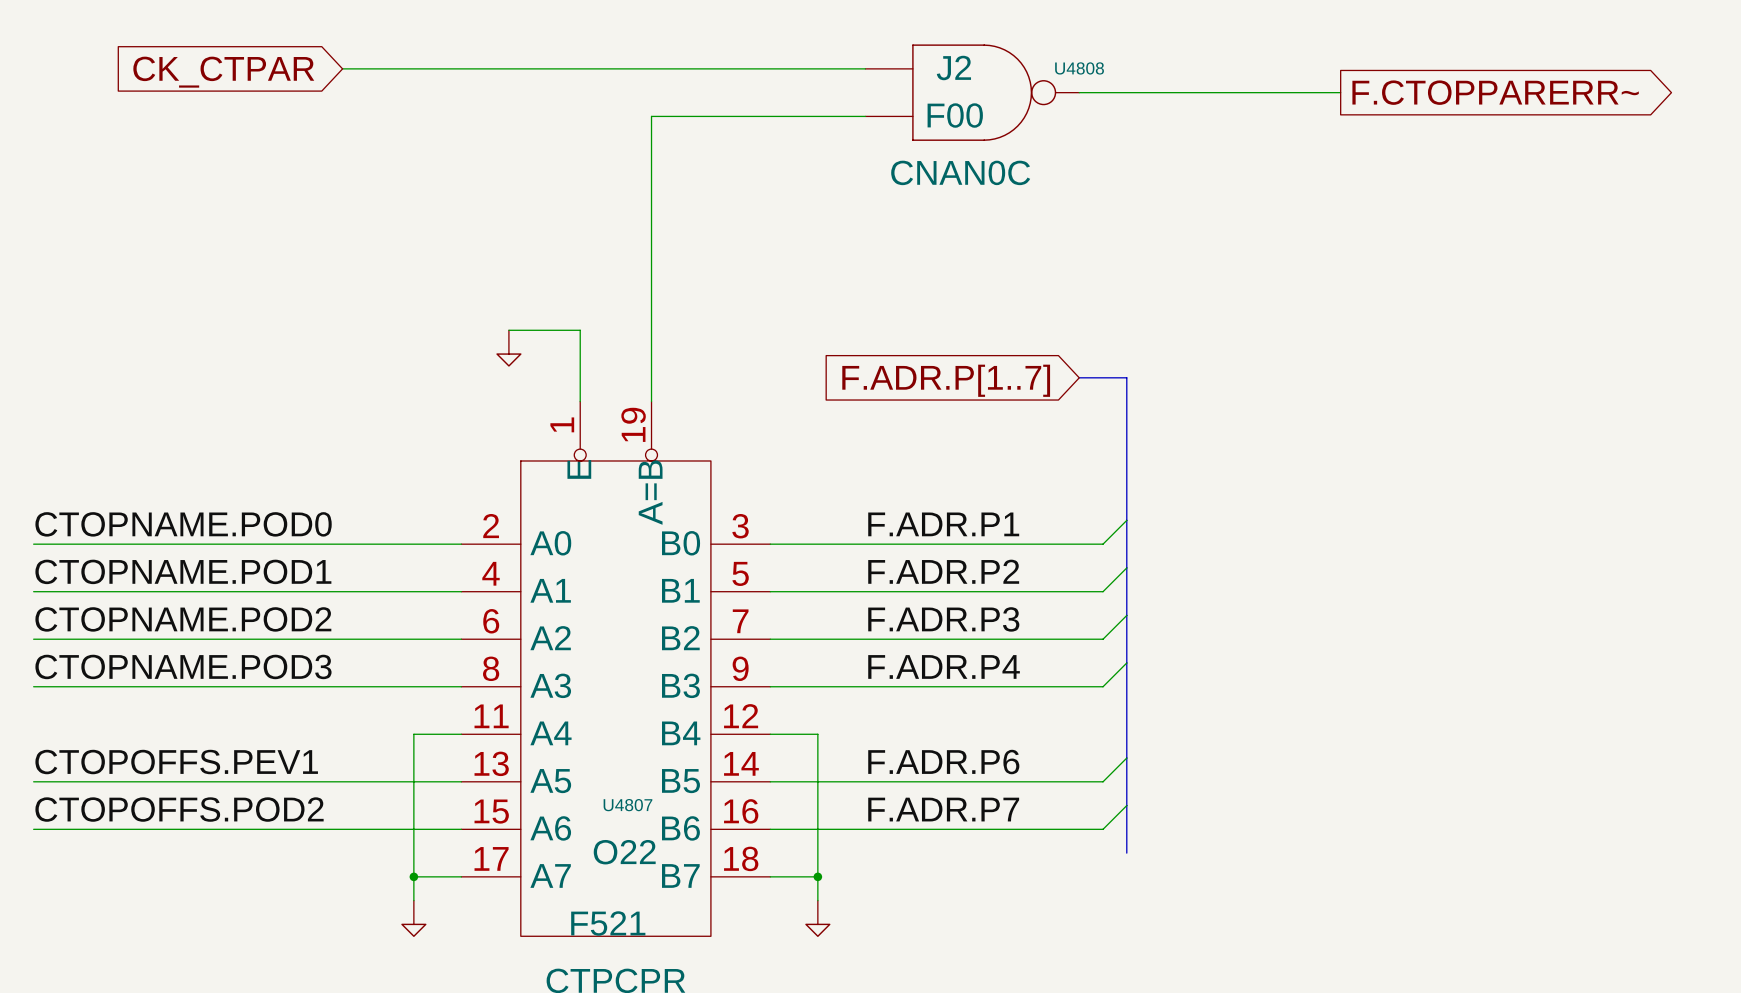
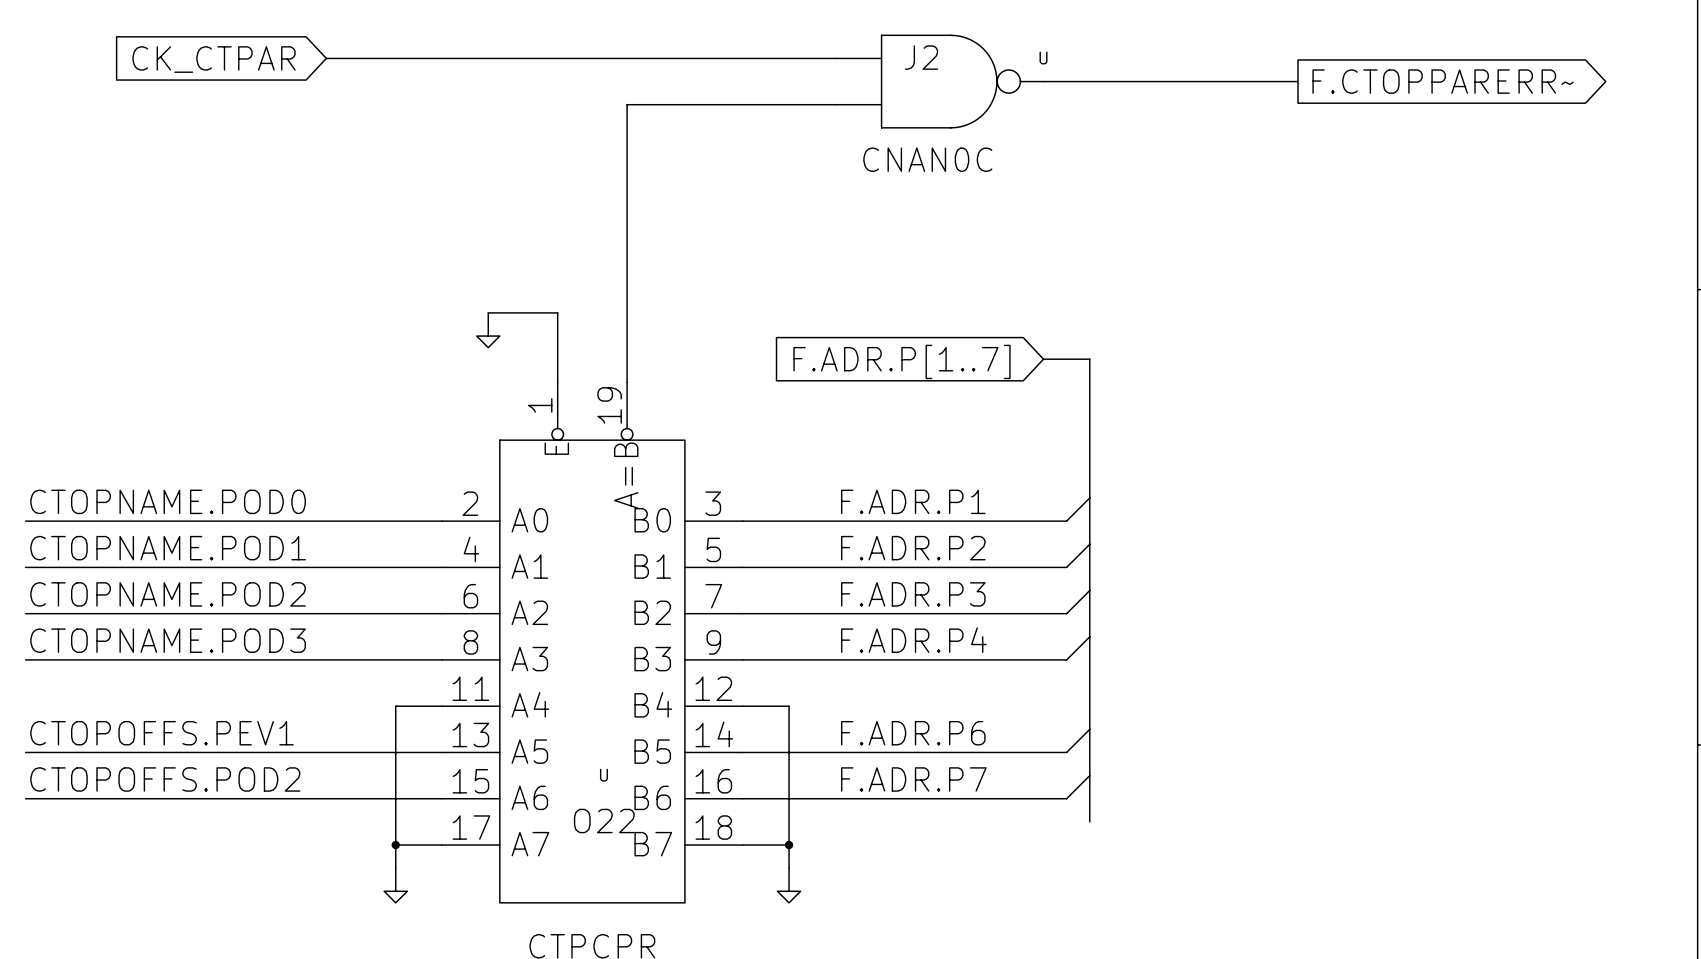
U4808 name: U4808 (1079, 68) -> U (1043, 58)
U4808 value: F00 (955, 115) -> none
U4807 name: U4807 (627, 805) -> U (603, 775)
U4807 value: F521 (608, 923) -> none

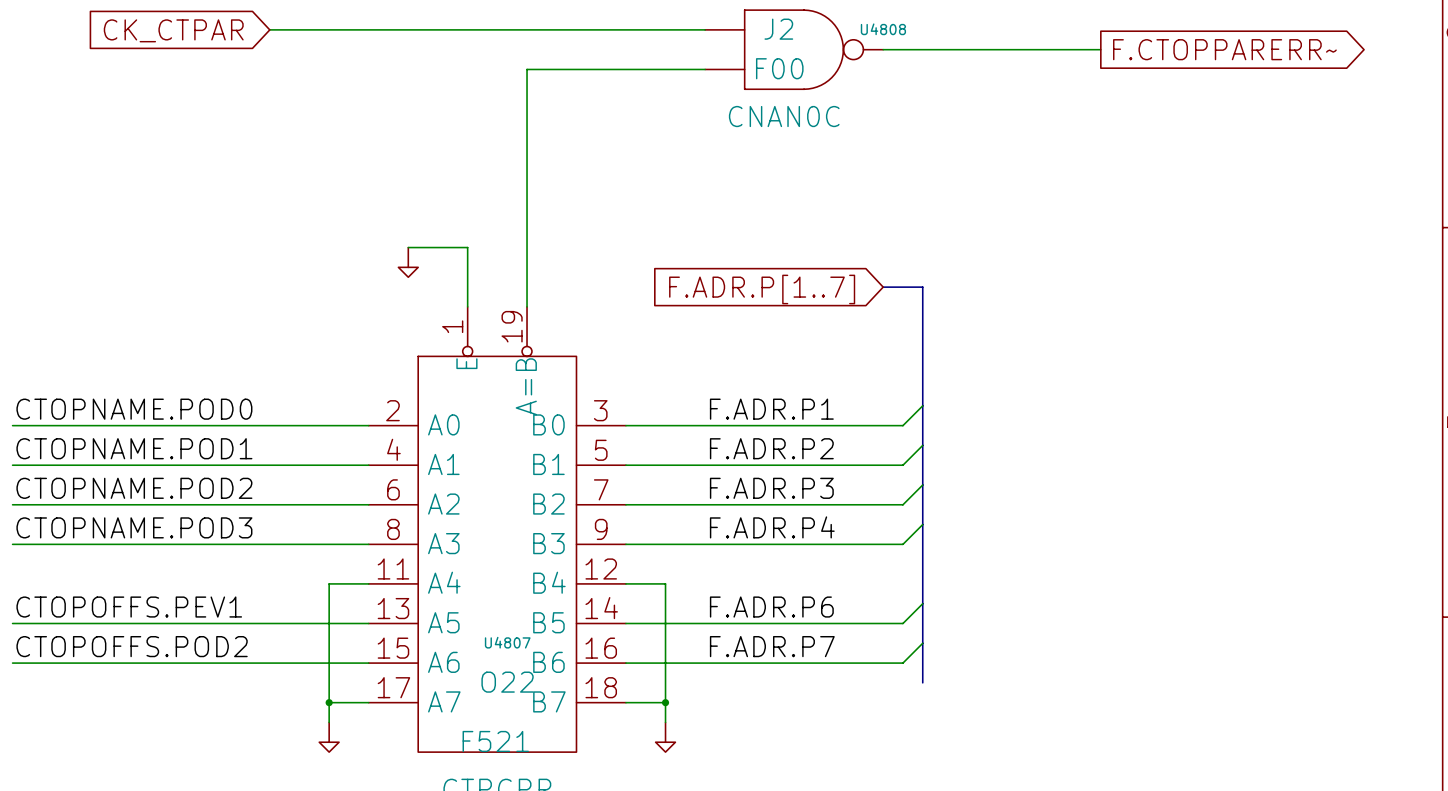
U name: U (1043, 58) -> U4808 (883, 29)
U value: none -> F00 (779, 68)
U name: U (603, 775) -> U4807 (507, 642)
U value: none -> F521 (495, 741)

